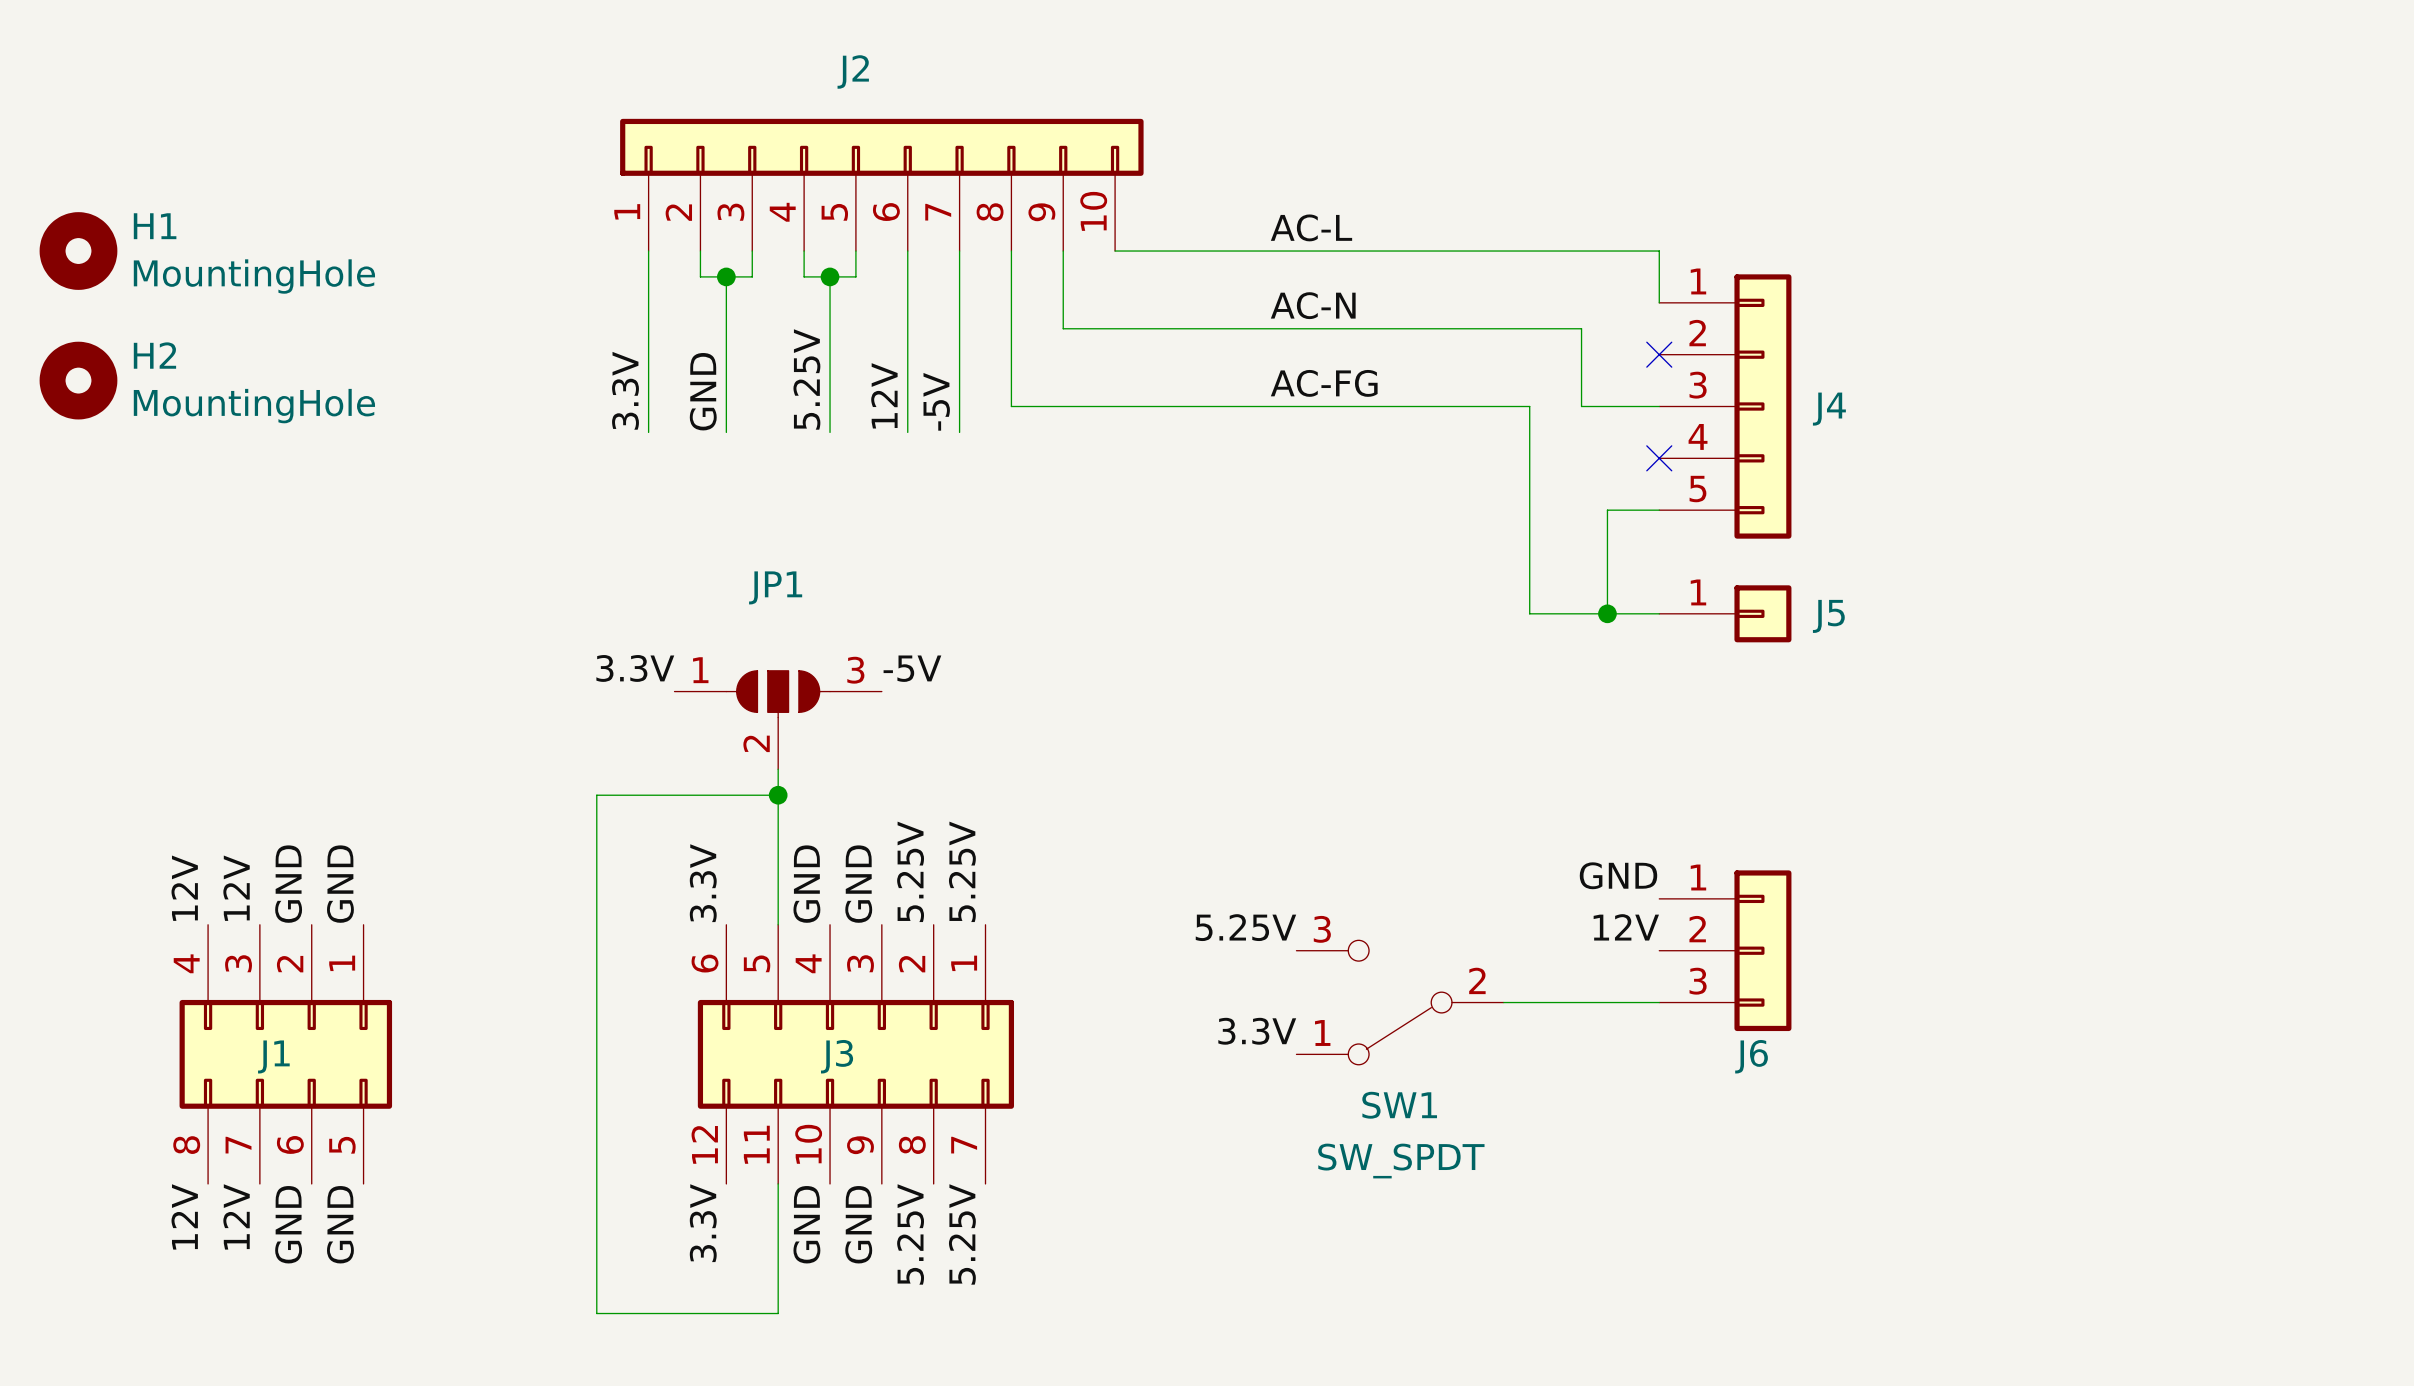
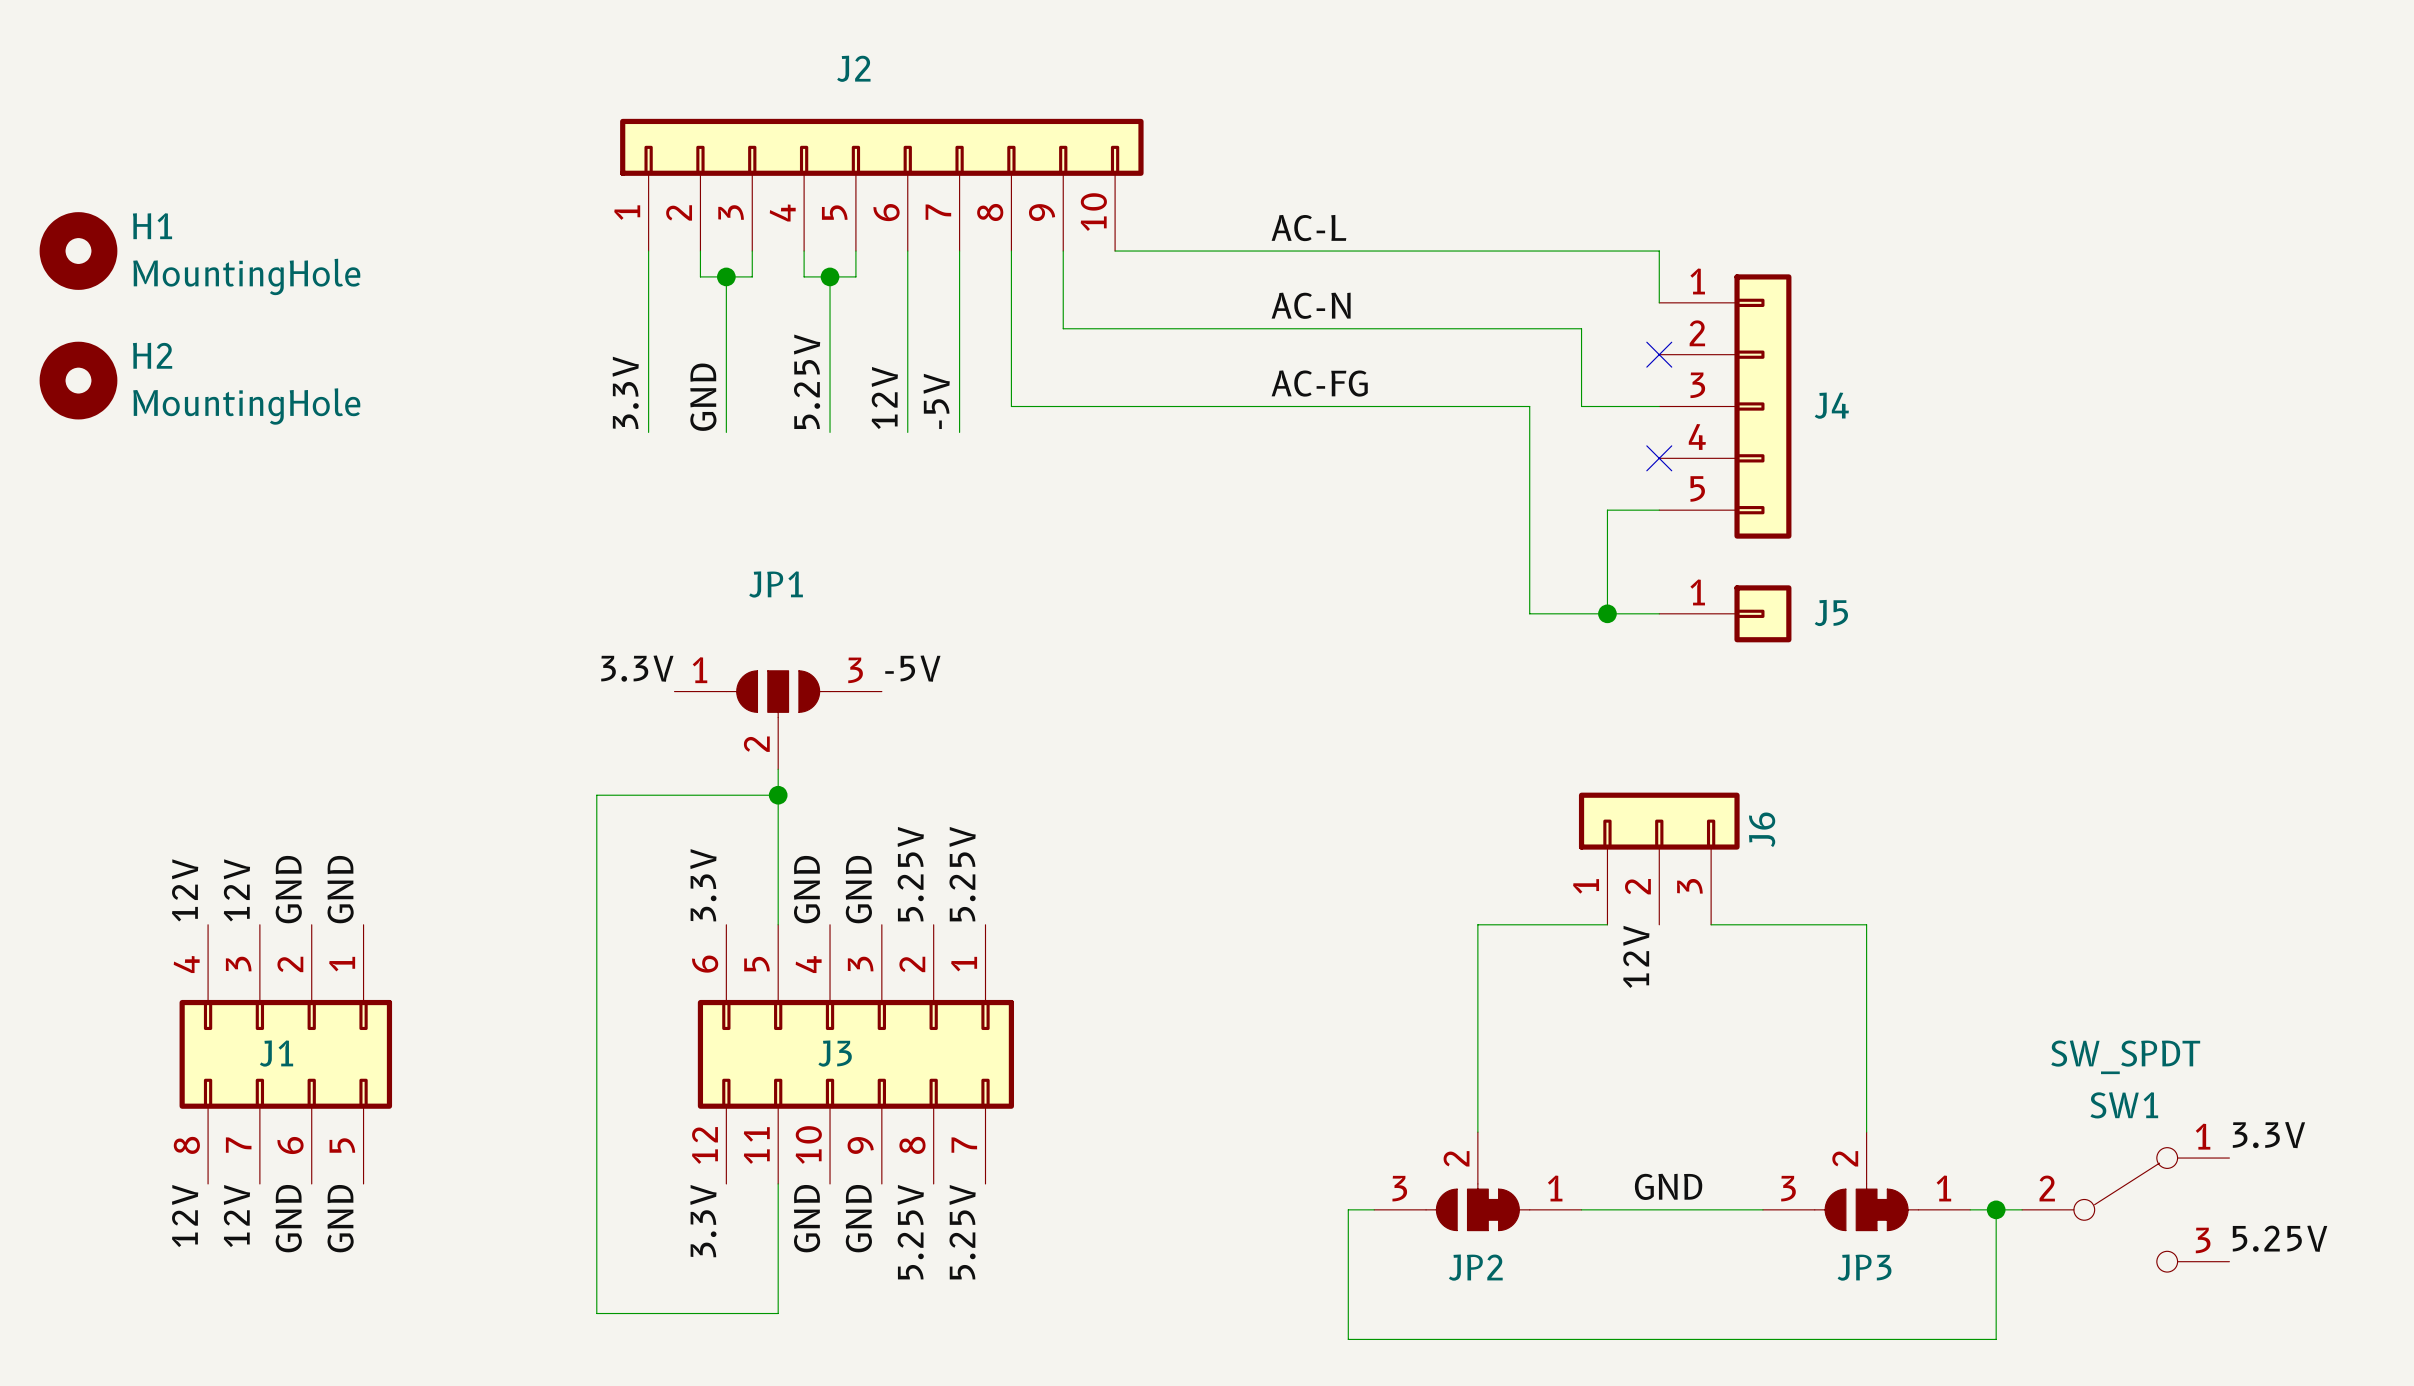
label position: GND (1618, 875) -> GND (1668, 1186)
wire: none -> (1607, 924) (1477, 924) (1477, 1132)
wire: none -> (1711, 924) (1866, 924) (1866, 1132)
label: 5.25V (1245, 927) -> none
label rotation: 0° (1626, 927) -> 90° counterclockwise (1636, 956)
J6 position: (1725, 950) -> (1659, 858)
J6 rotation: 0° (1762, 950) -> 90° counterclockwise (1659, 821)
SW1 rotation: 0° (1400, 1002) -> 180° (2125, 1209)
SW1 position: (1400, 1002) -> (2125, 1209)
wire: (1503, 1002) (1659, 1002) -> none
label: 3.3V (1257, 1031) -> none
label: none -> 3.3V (2268, 1135)
JP2: none -> (1477, 1181)
JP3: none -> (1866, 1181)
wire: none -> (1374, 1209) (1348, 1209) (1348, 1339) (1996, 1339) (1996, 1209)
wire: none -> (1581, 1209) (1762, 1209)
wire: none -> (1970, 1209) (2022, 1209)
junction: none -> (1996, 1209)
label: none -> 5.25V (2280, 1238)

